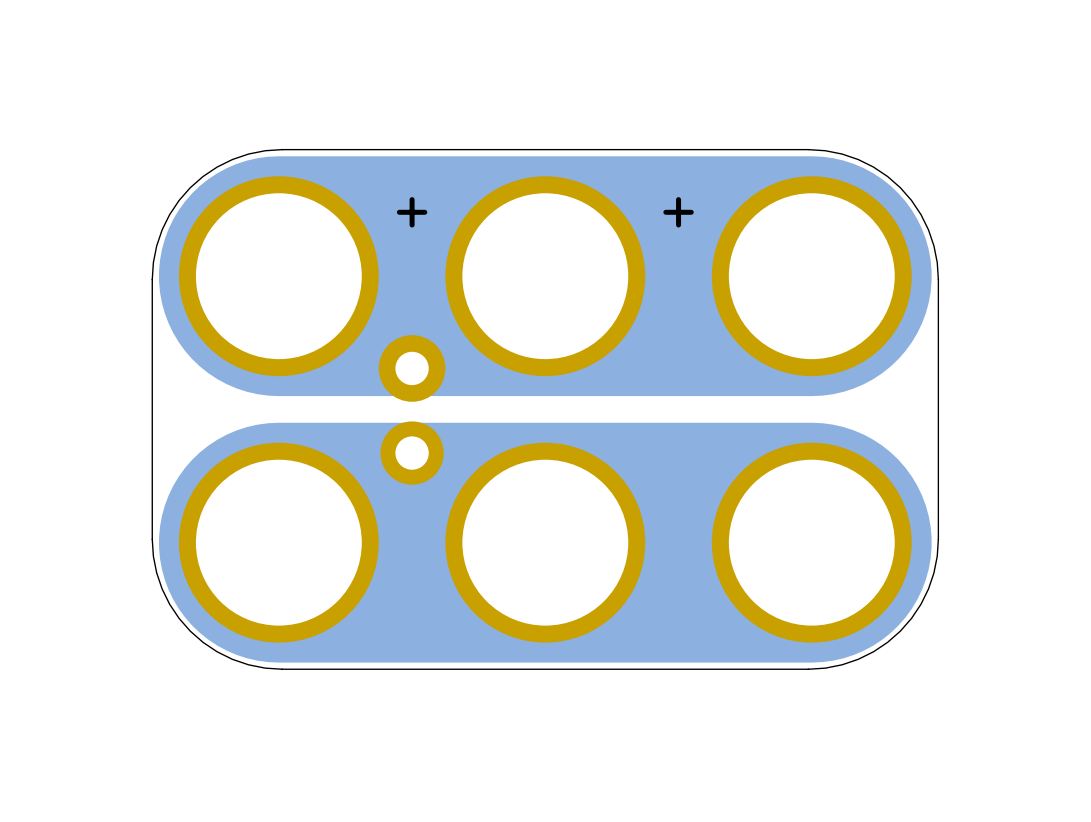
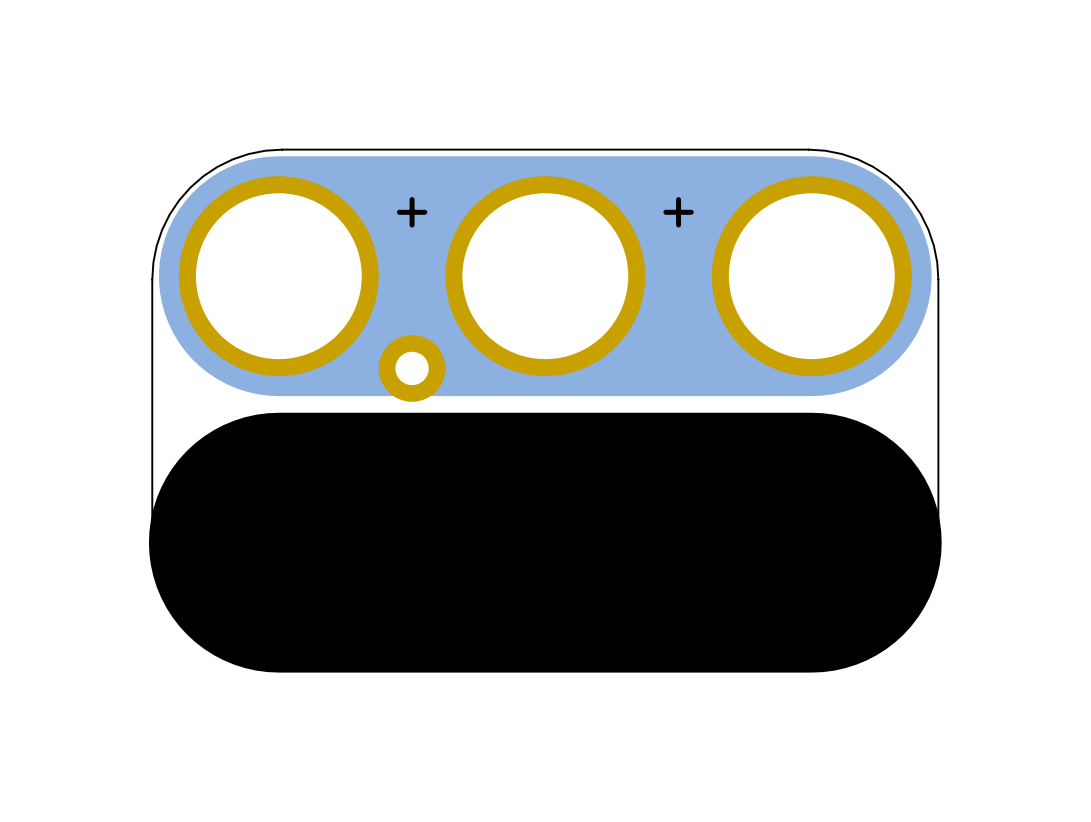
part footprint: [151, 148, 940, 670] -> [148, 148, 942, 673]

